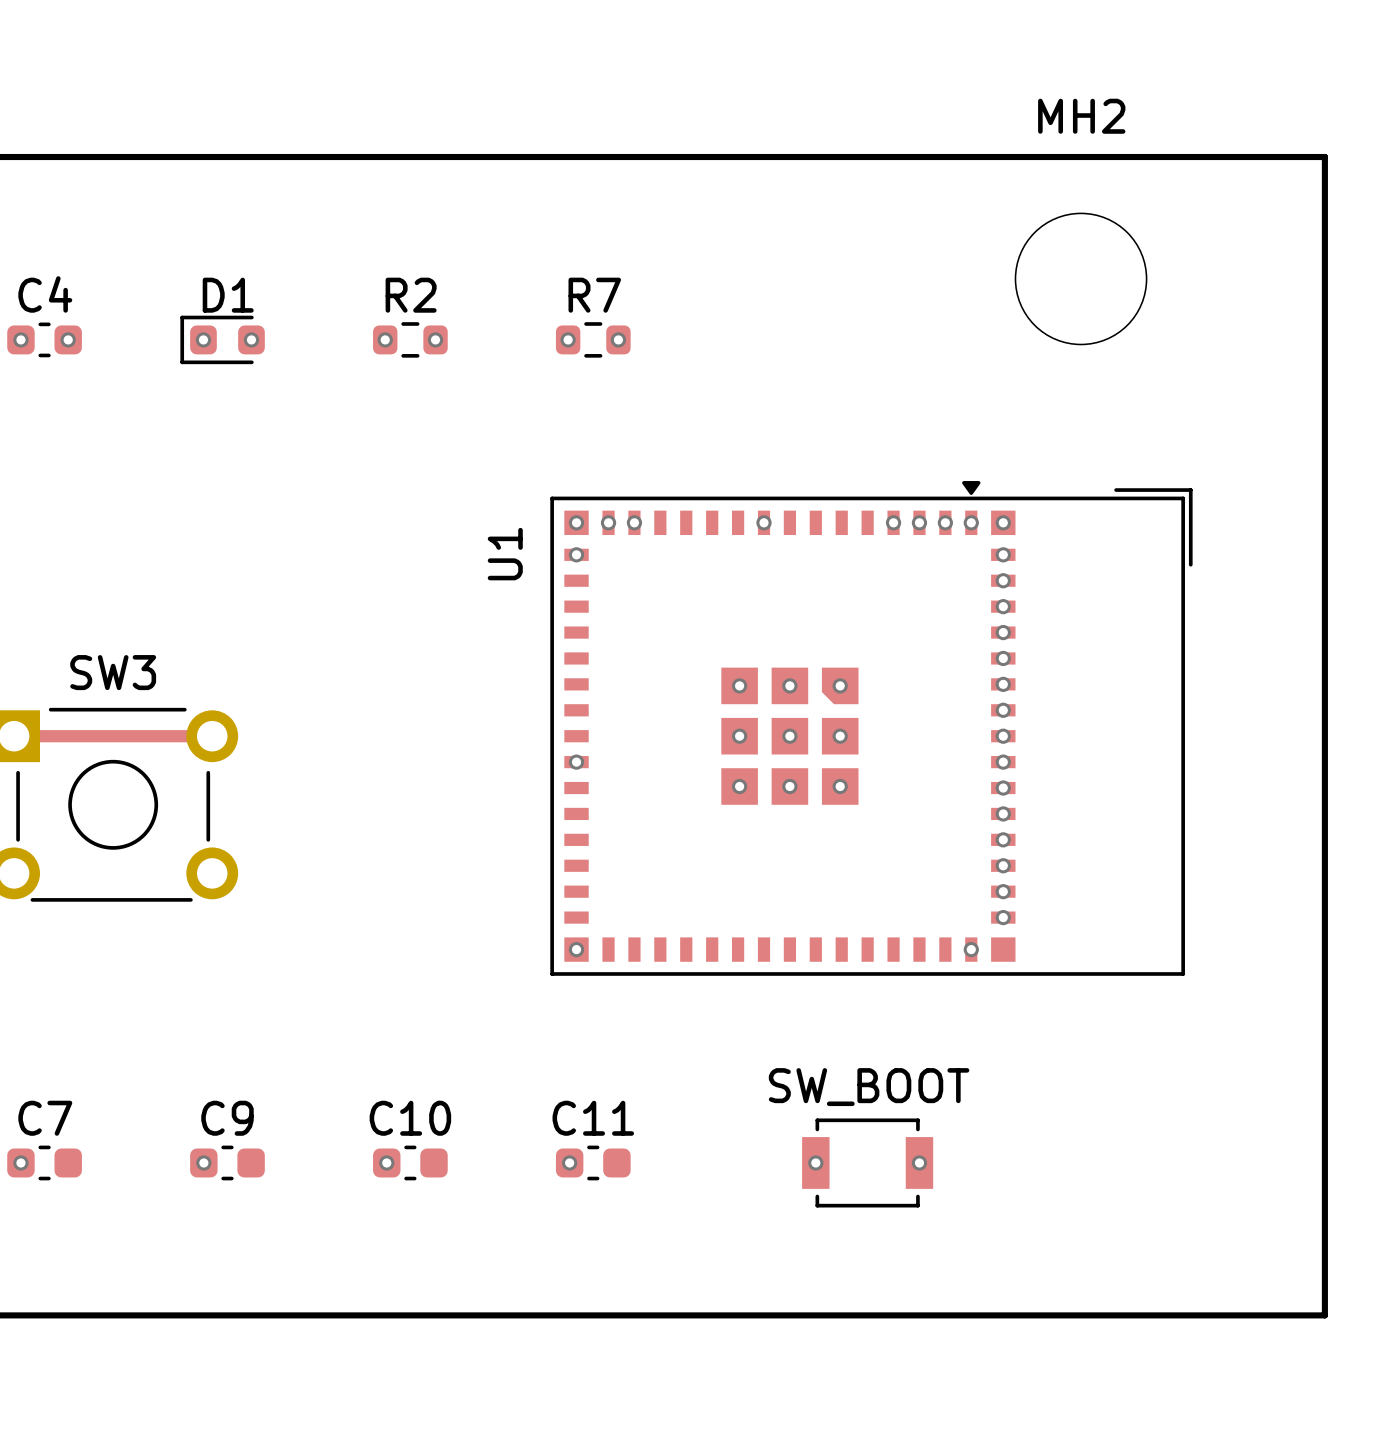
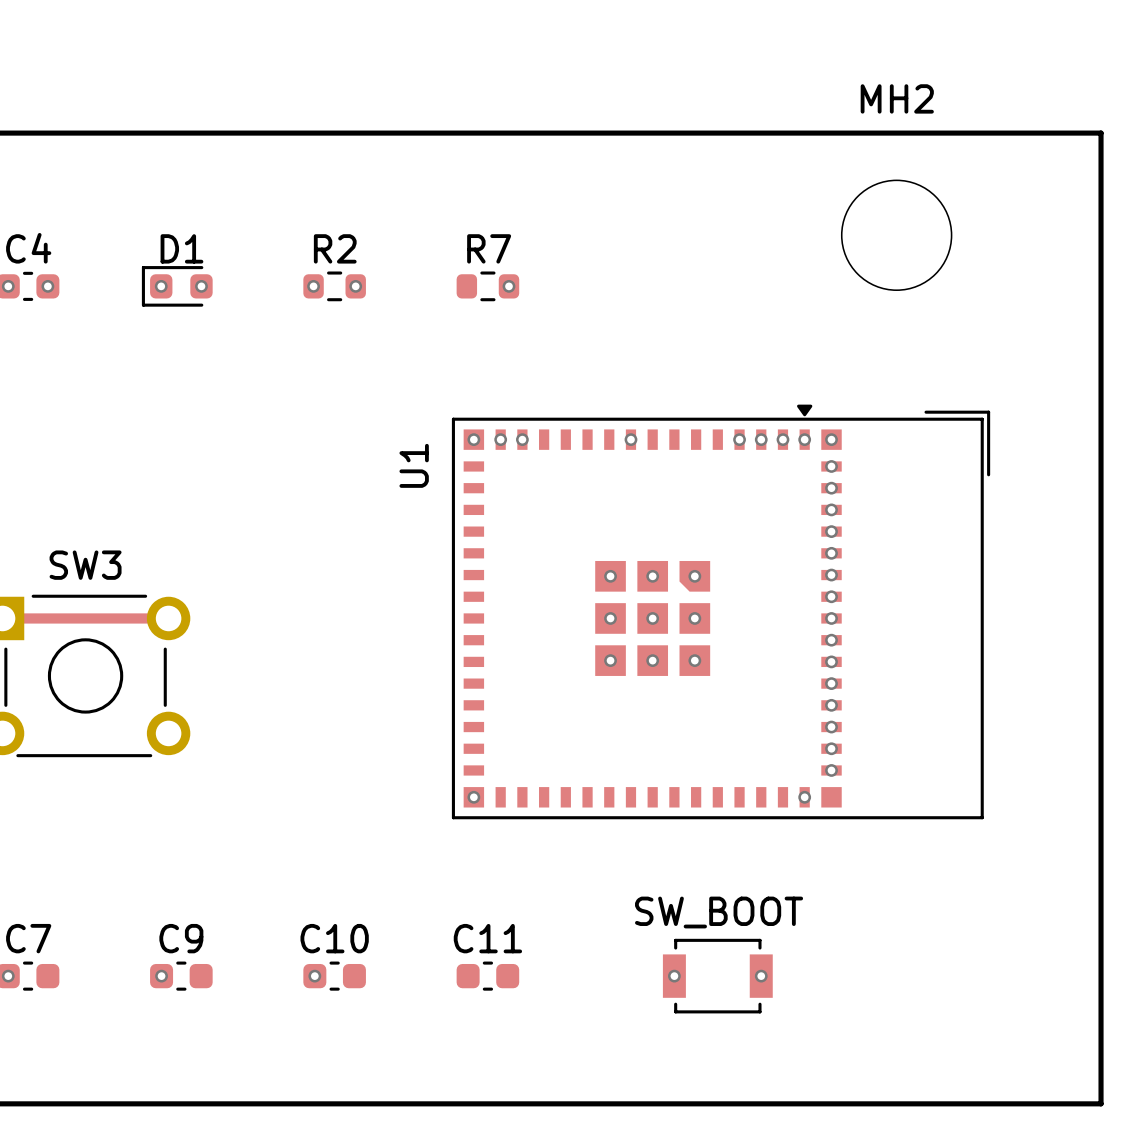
via: (568, 339) -> none
via: (576, 554) -> none
via: (576, 762) -> none
via: (569, 1162) -> none

